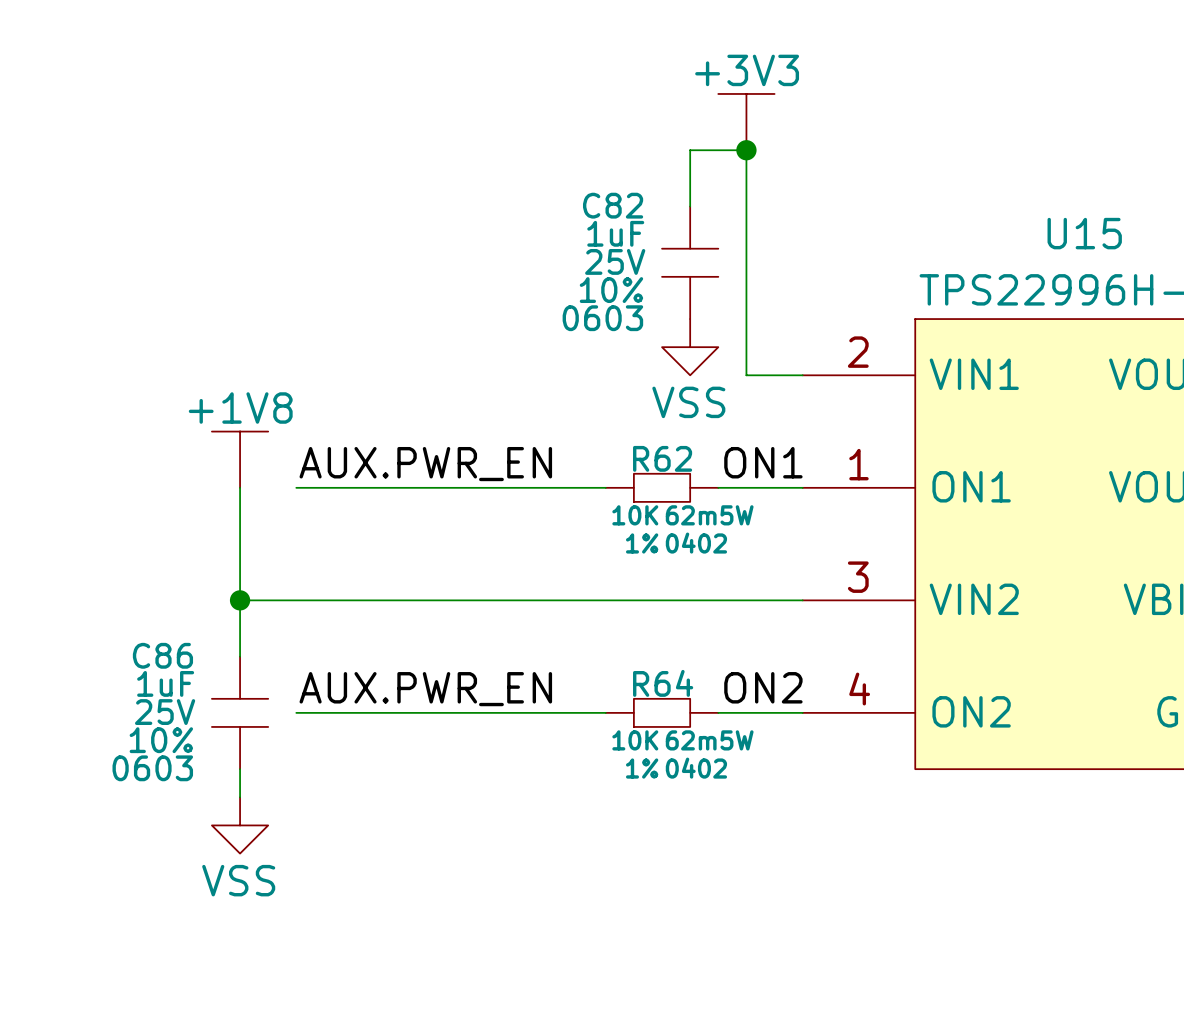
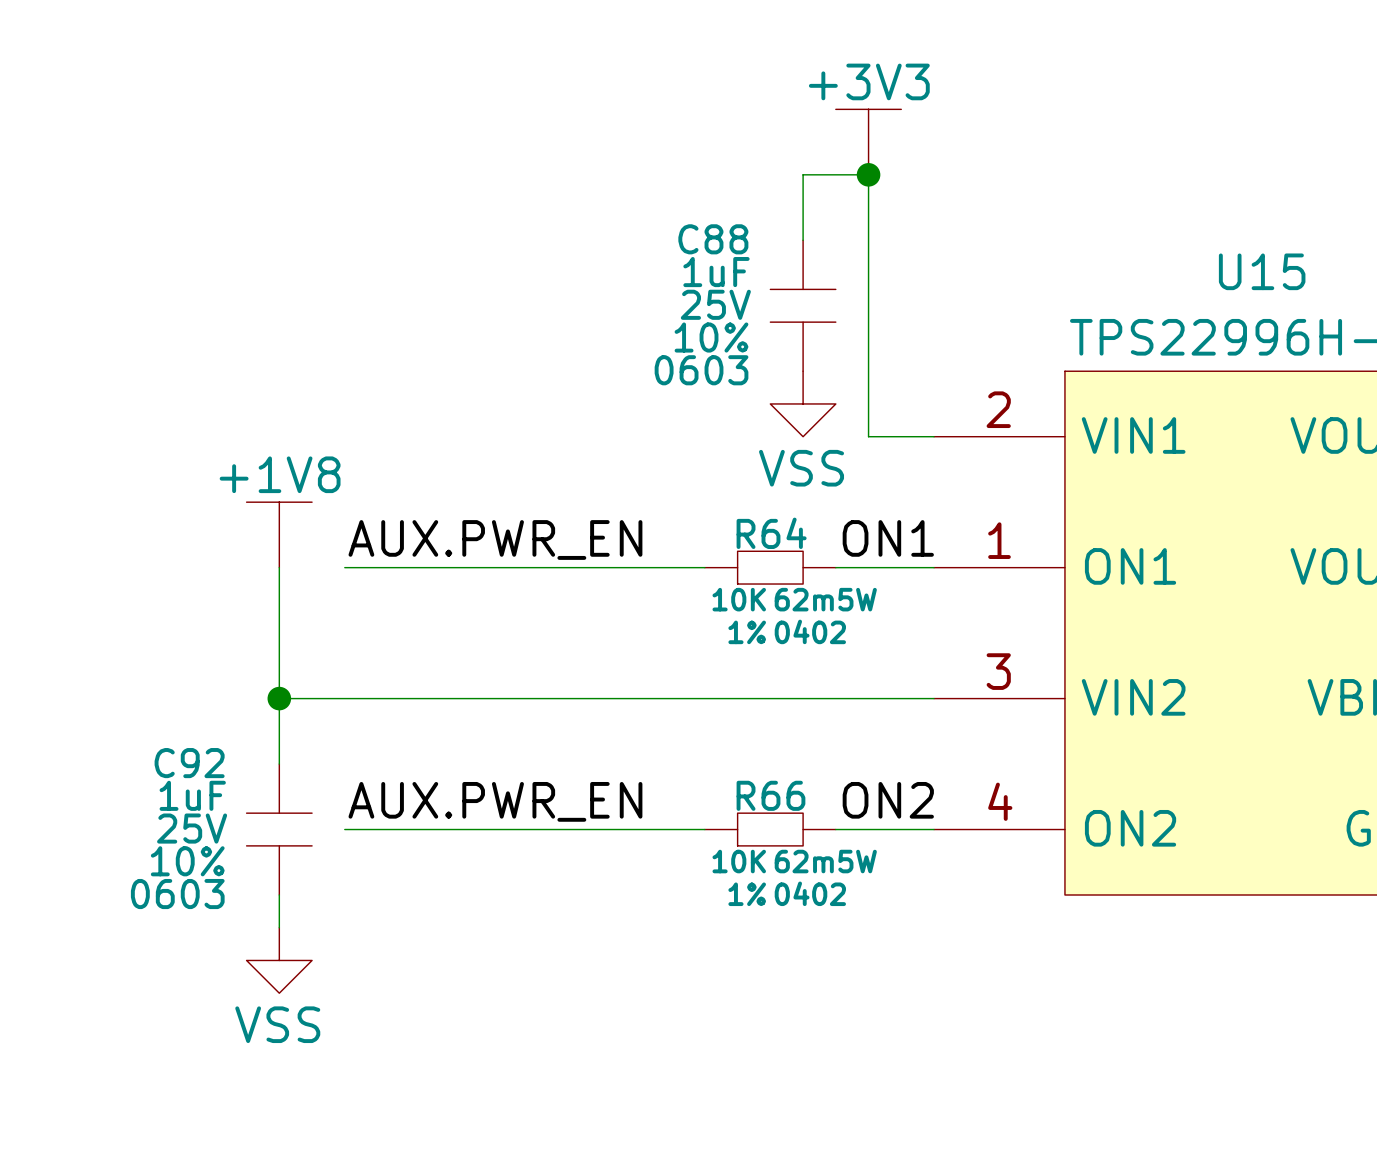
C82 name: C82 (613, 205) -> C88 (713, 239)
R62 name: R62 (662, 458) -> R64 (771, 533)
C86 name: C86 (162, 655) -> C92 (189, 763)
R64 name: R64 (663, 683) -> R66 (770, 795)

